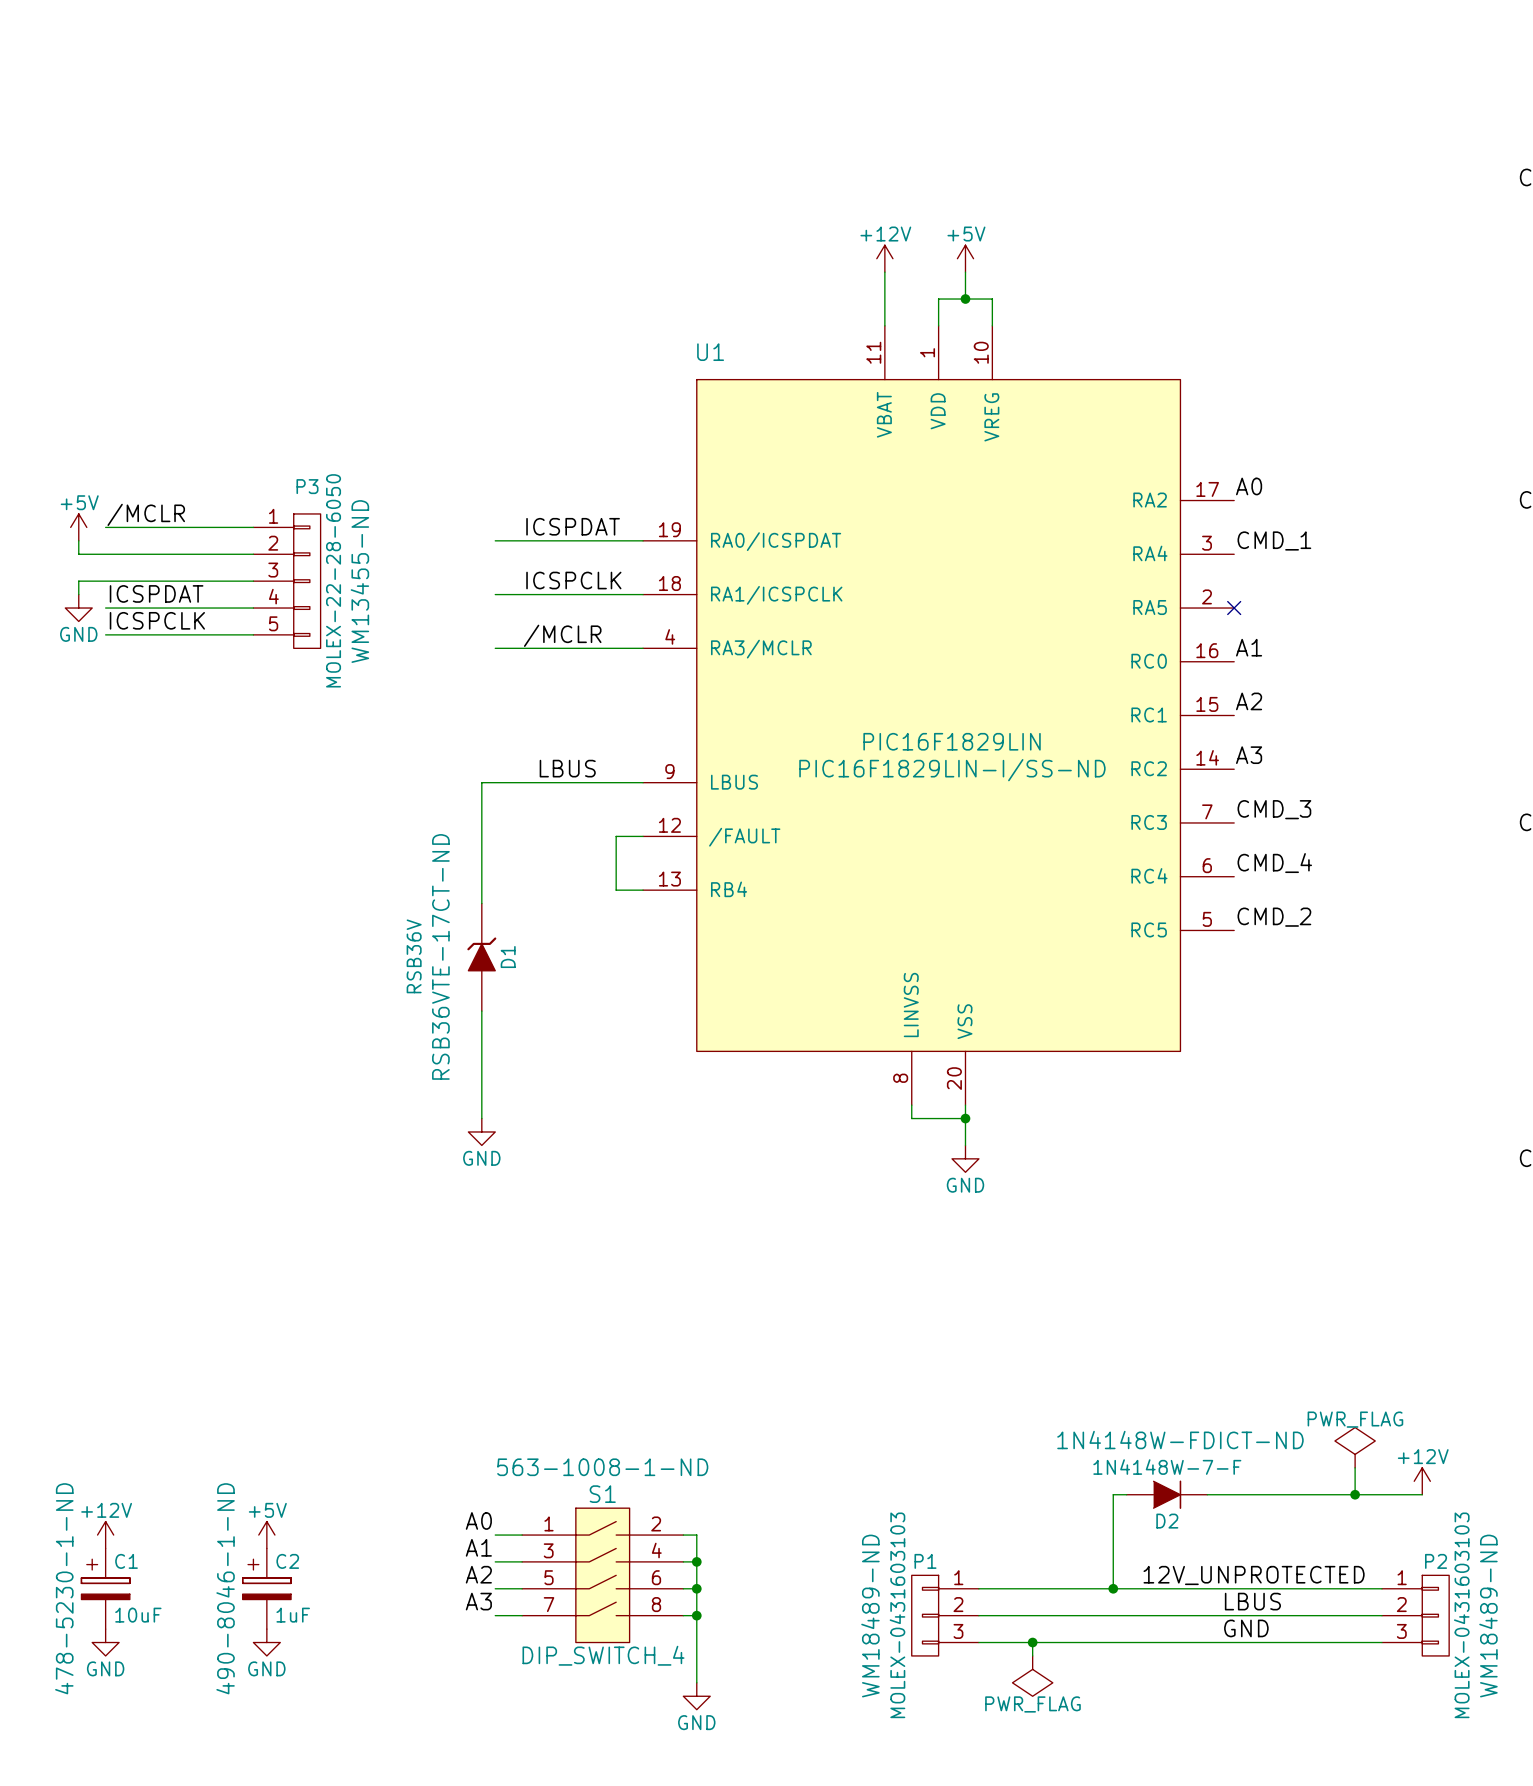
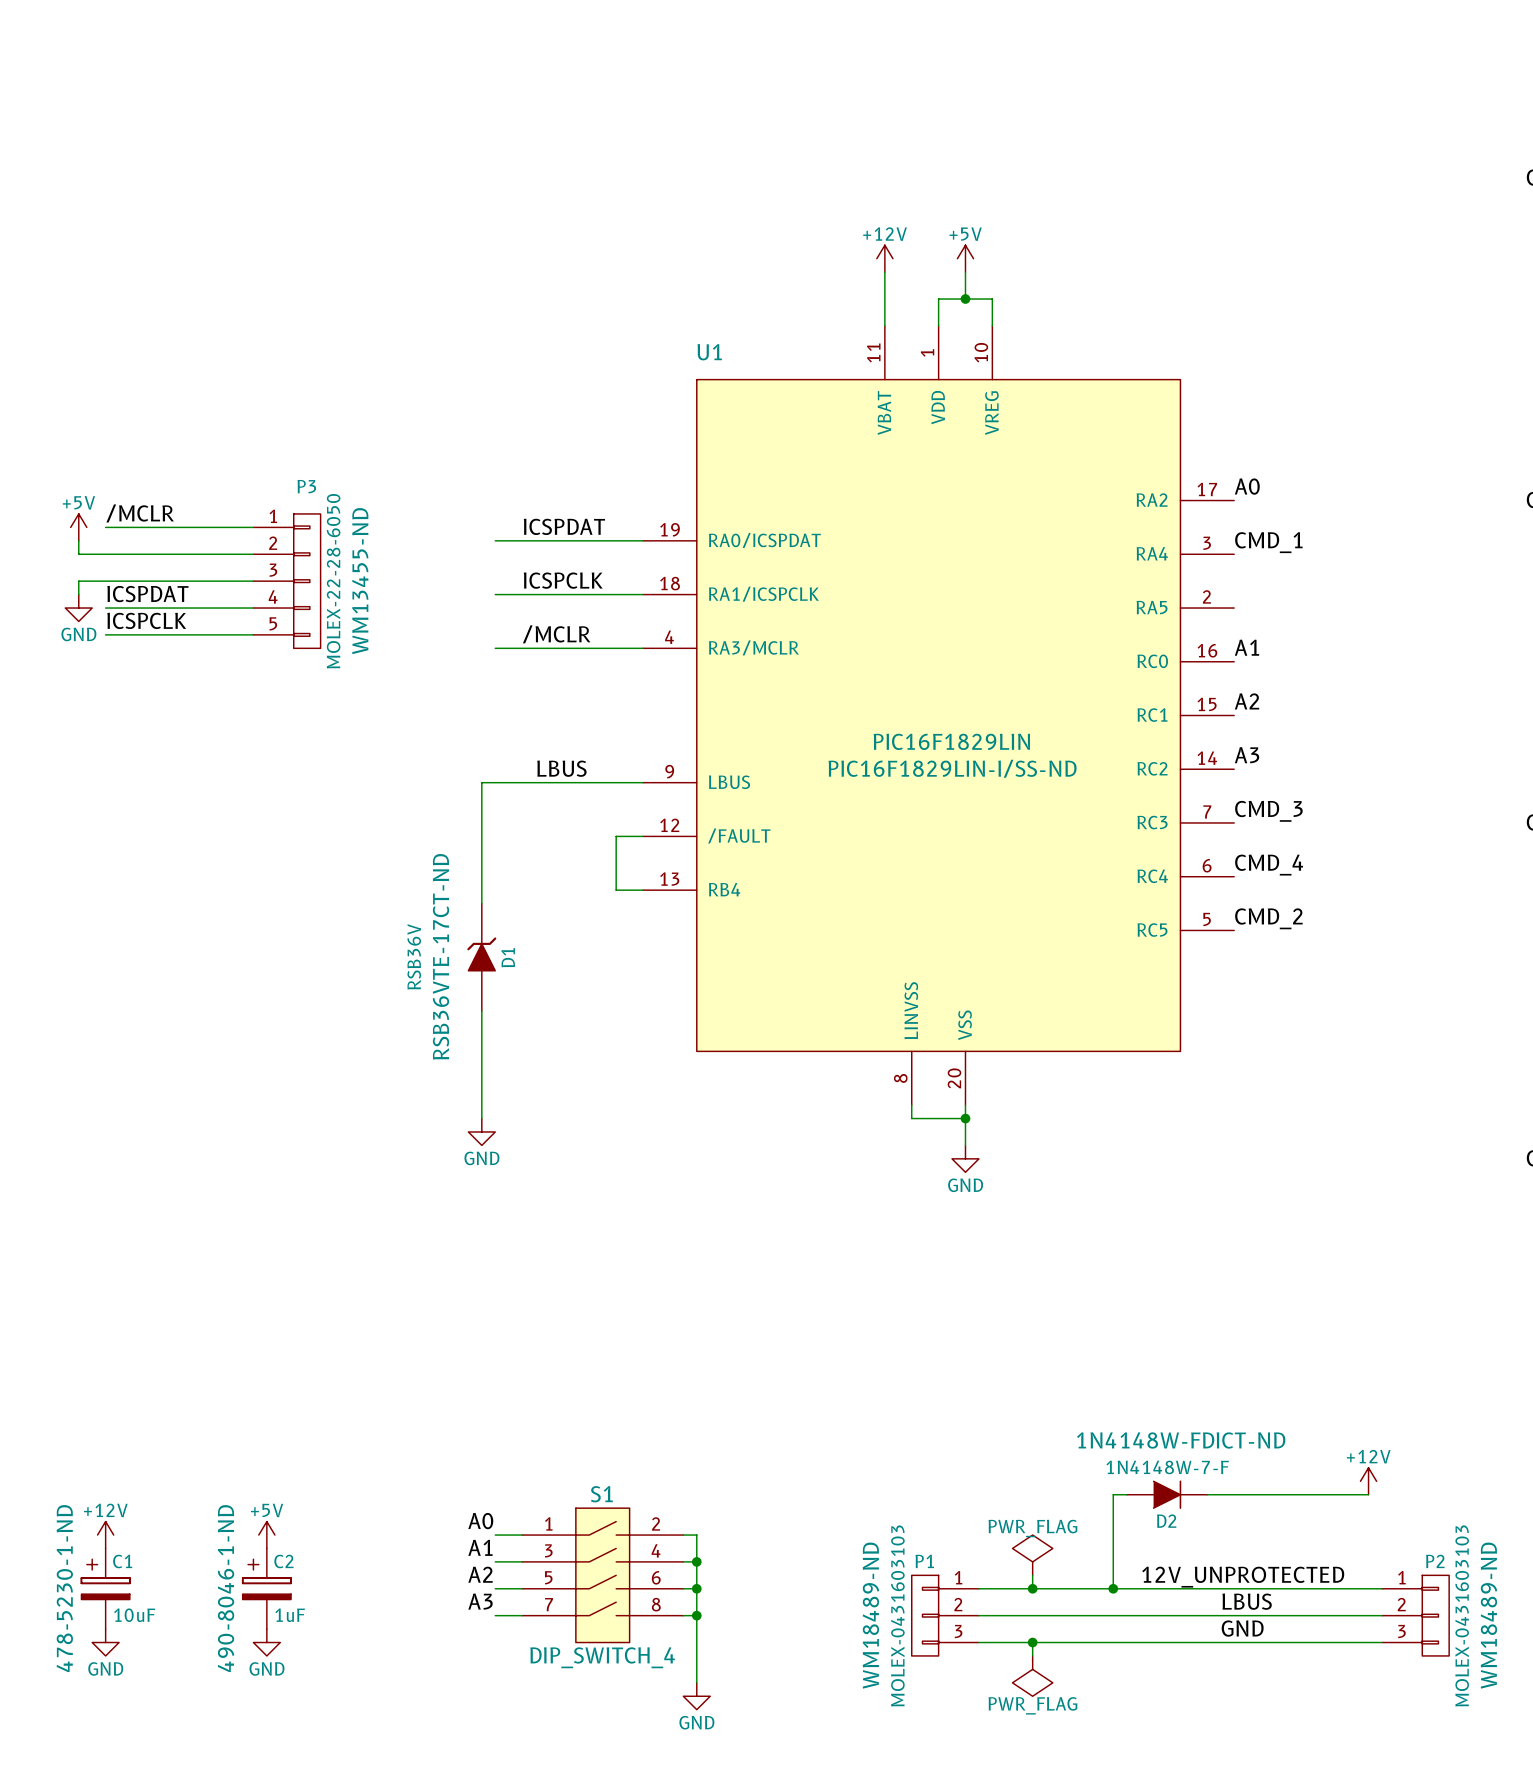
no-connect mark: (1234, 608) -> none
power symbol: PWR_FLAG (1355, 1447) -> none
S1 text: 563-1008-1-ND (602, 1467) -> none
wire: (1355, 1467) (1355, 1494) -> none
power symbol position: +12V (1422, 1481) -> +12V (1368, 1481)
junction: (1355, 1494) -> none
wire: (1368, 1494) (1422, 1494) -> none
power symbol: none -> PWR_FLAG (1032, 1555)
wire: none -> (1032, 1575) (1032, 1588)
junction: none -> (1032, 1588)

